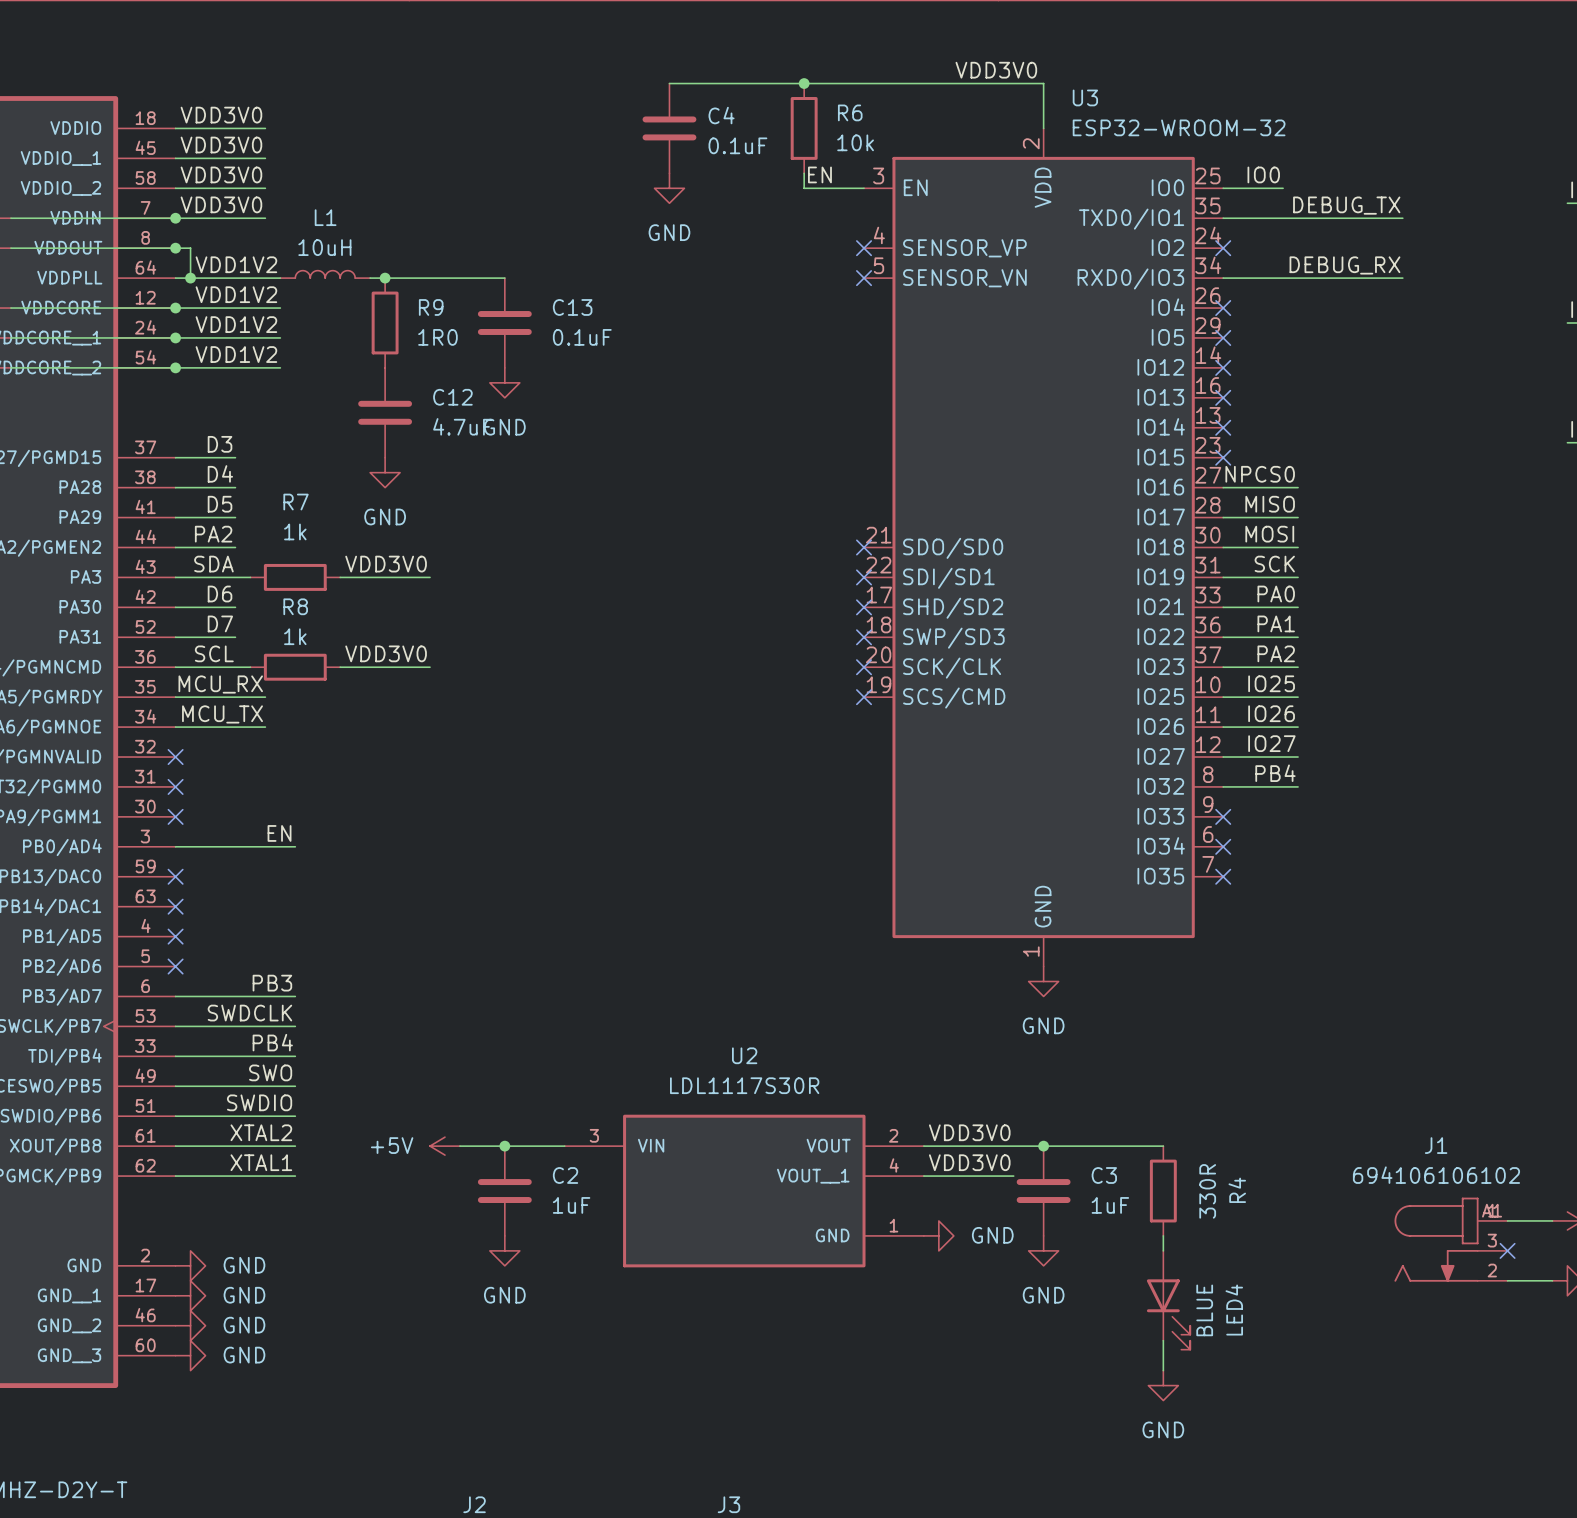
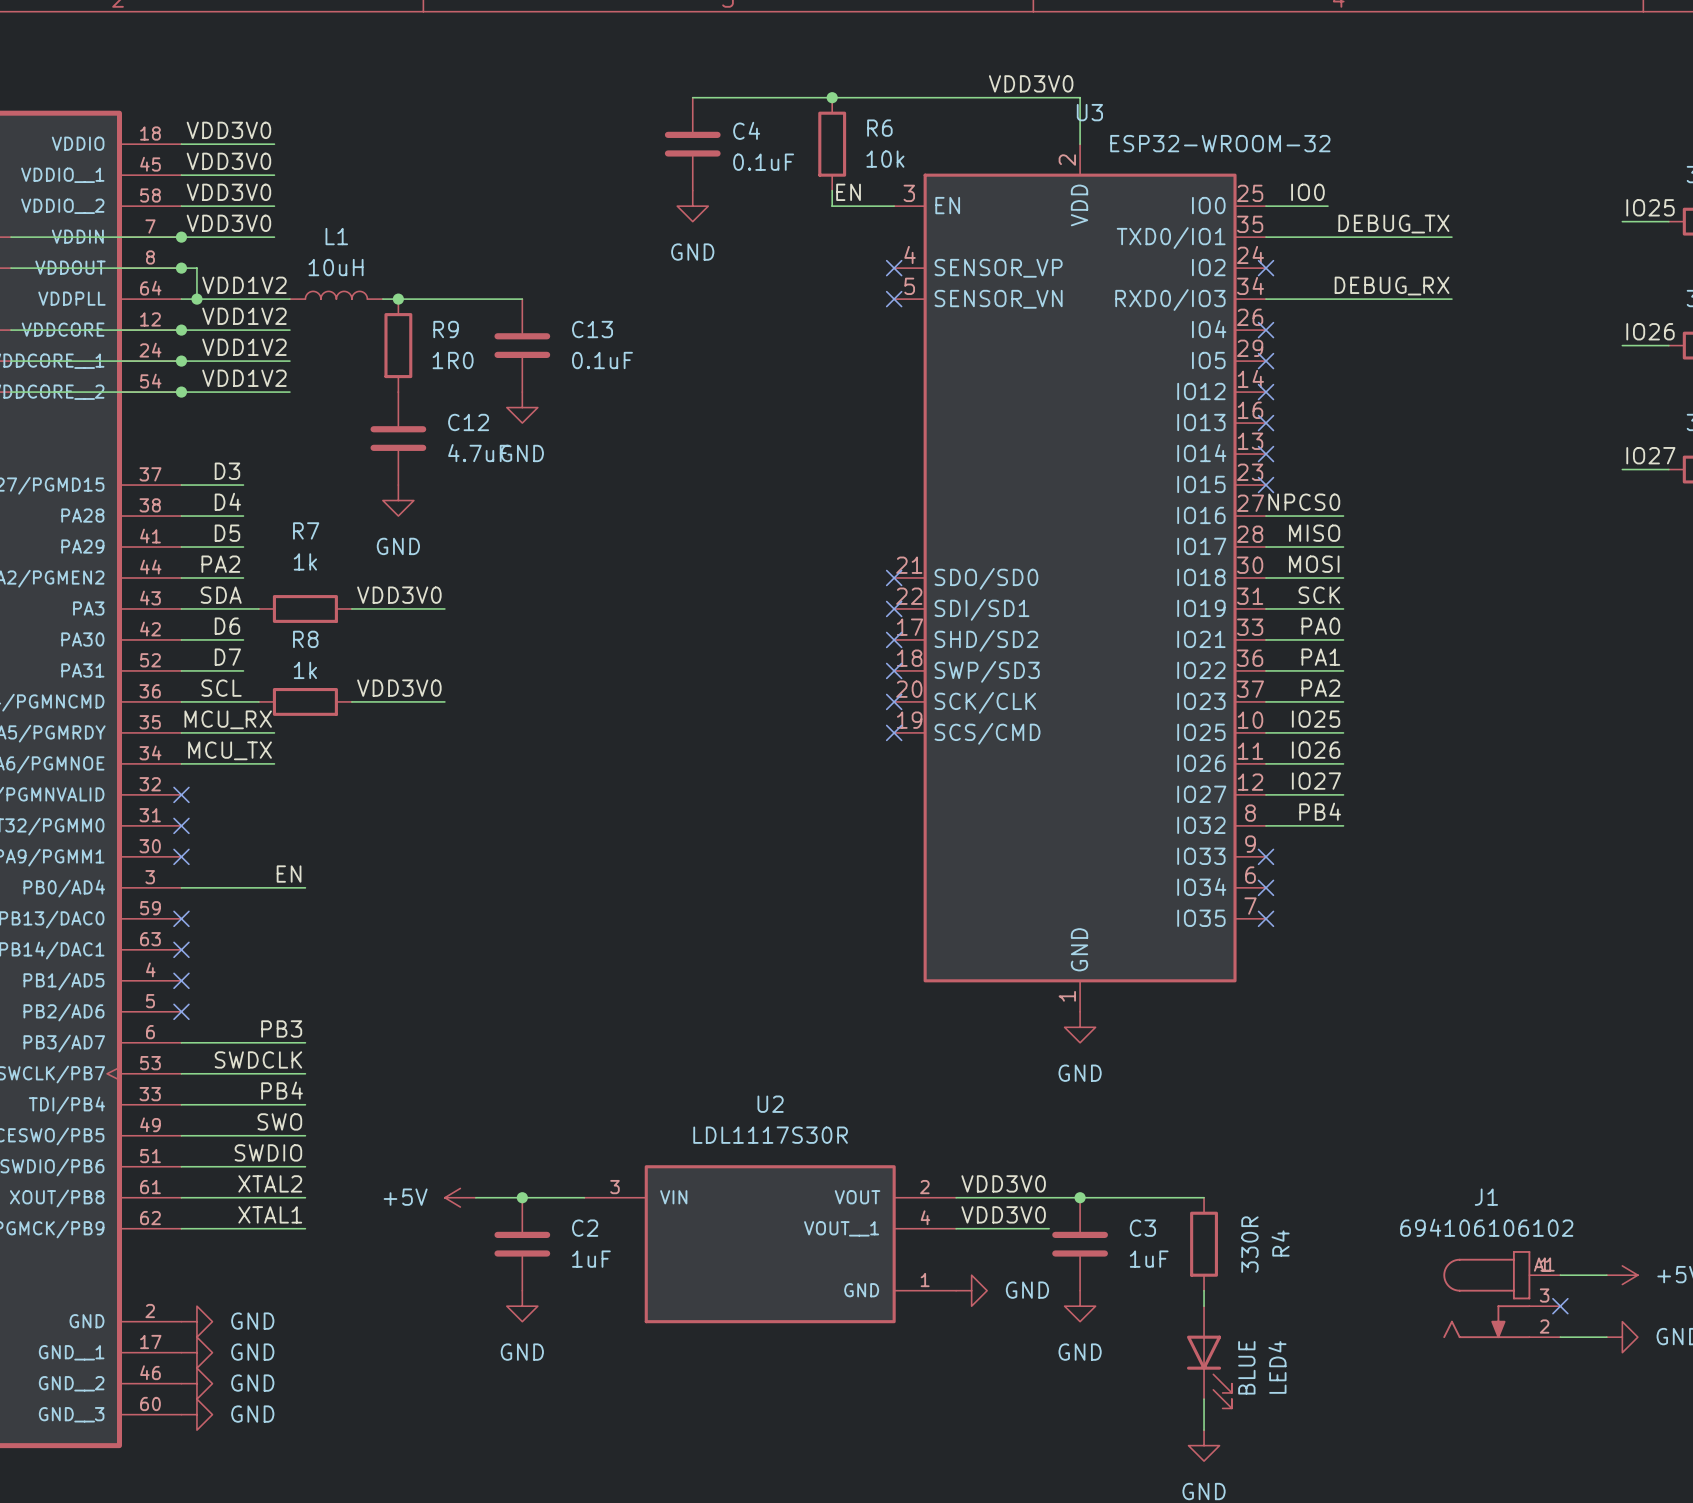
U3 name position: U3 (1085, 97) -> U3 (1089, 112)

